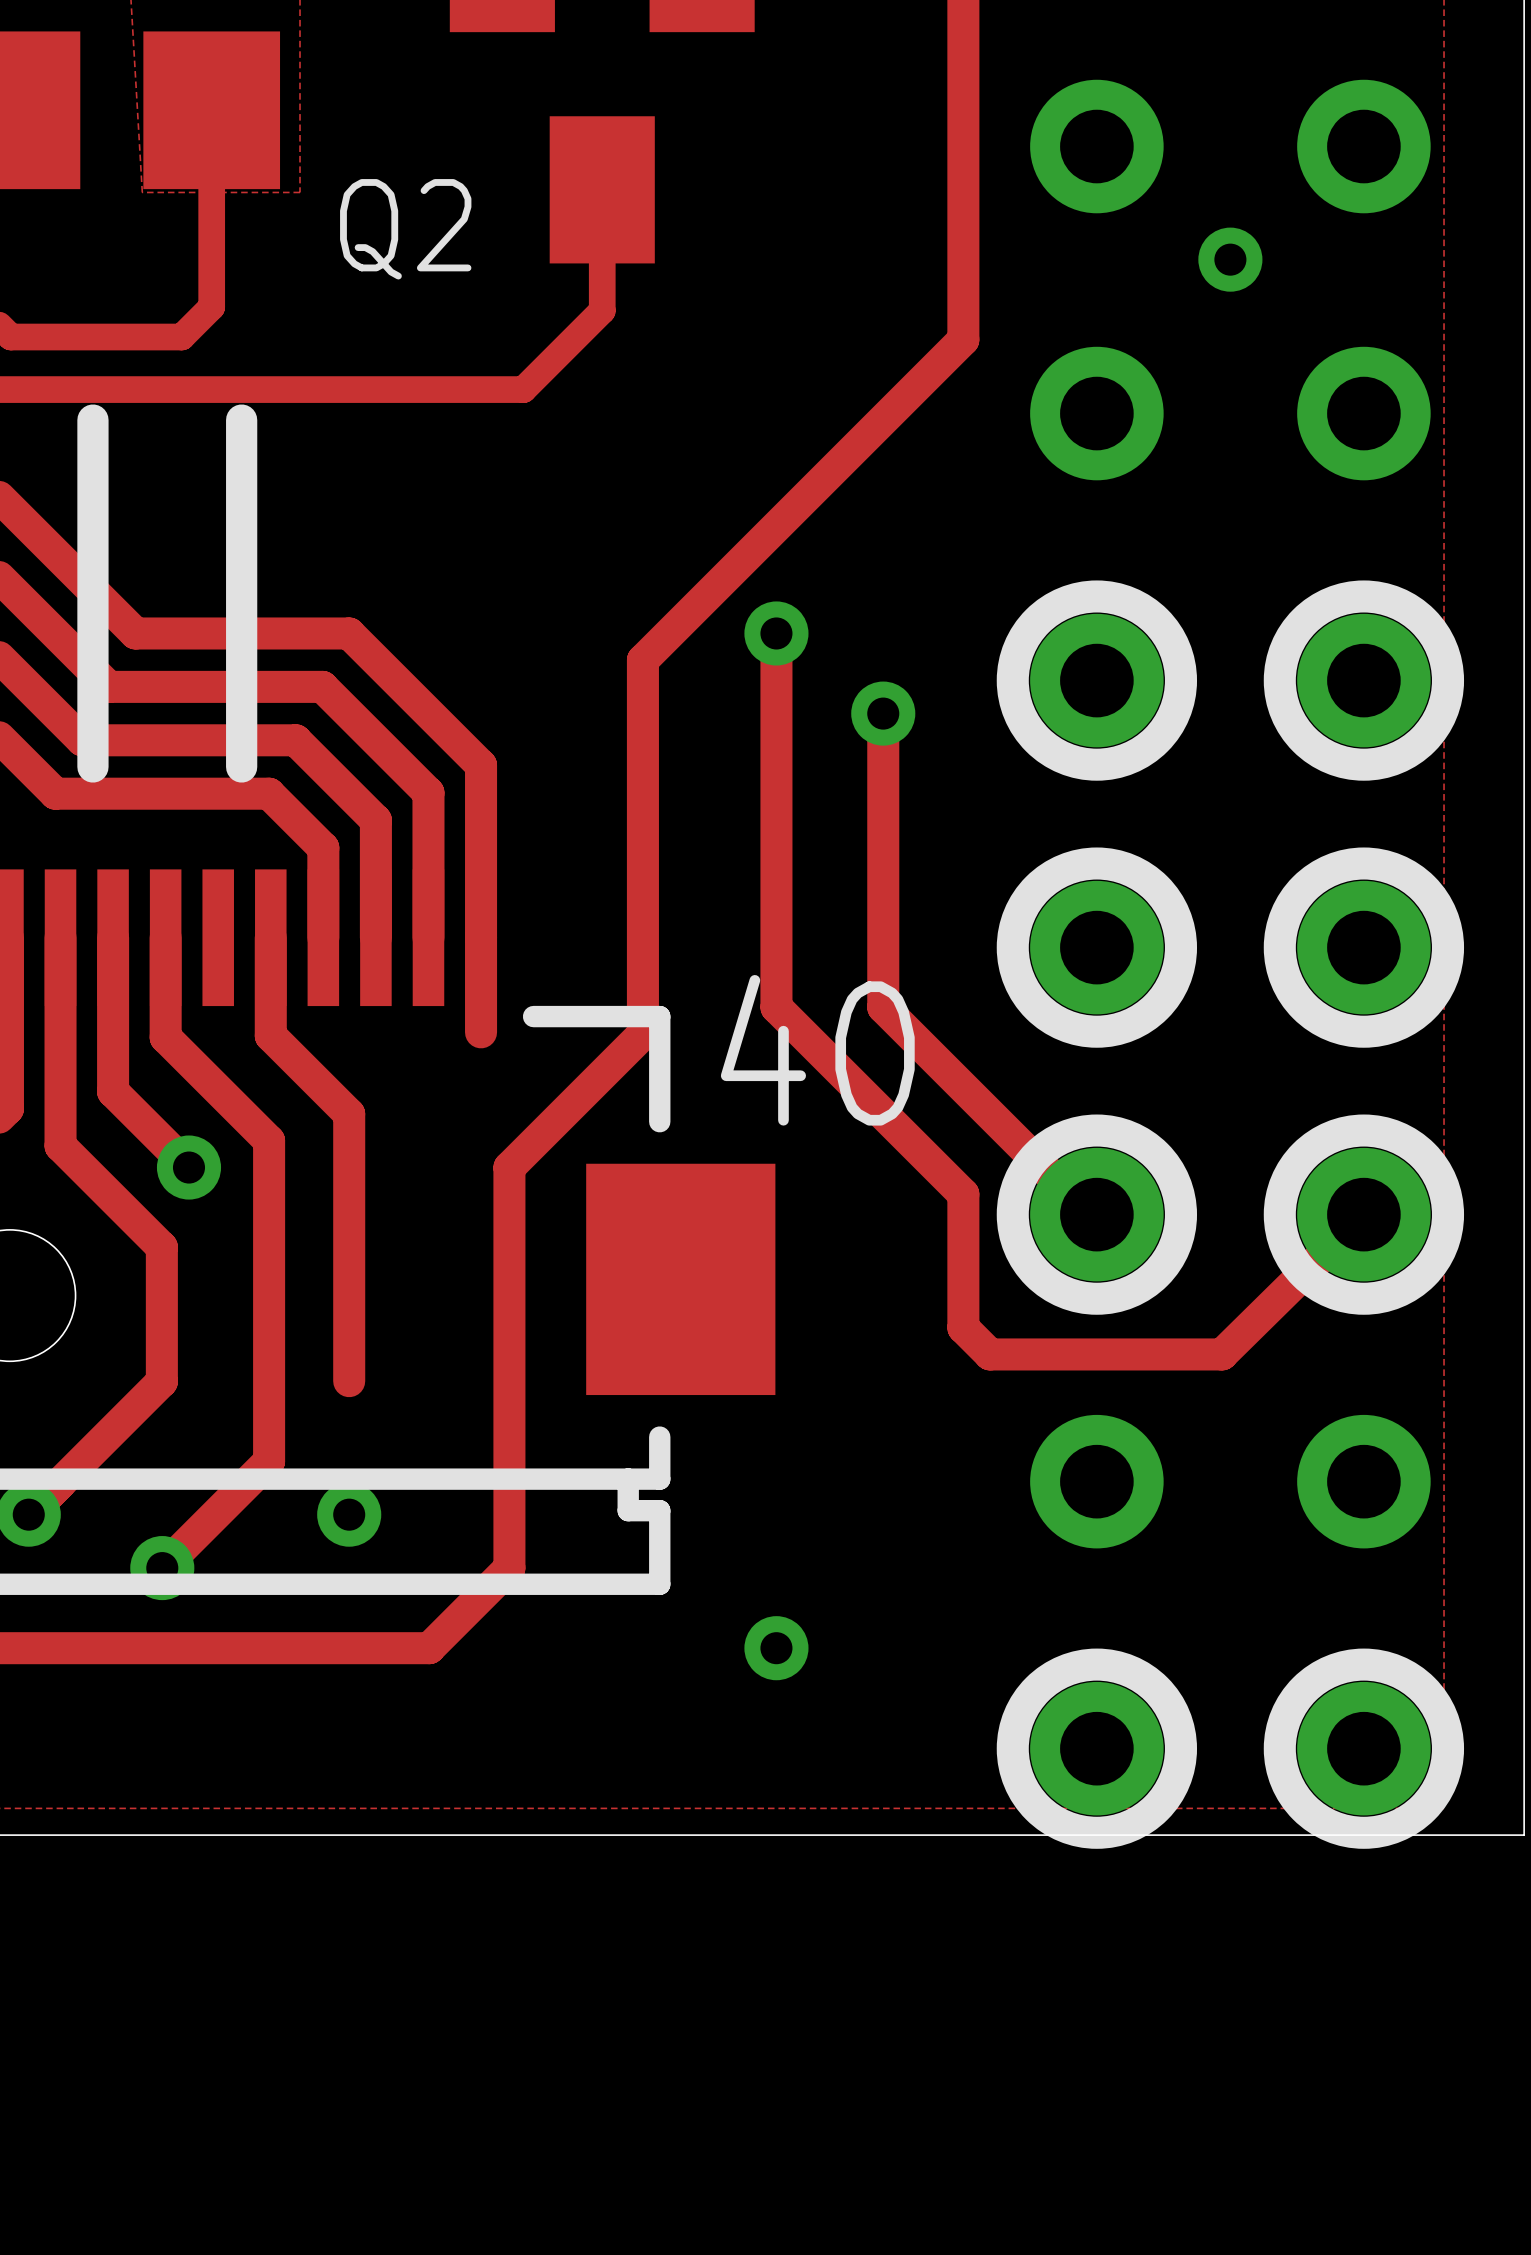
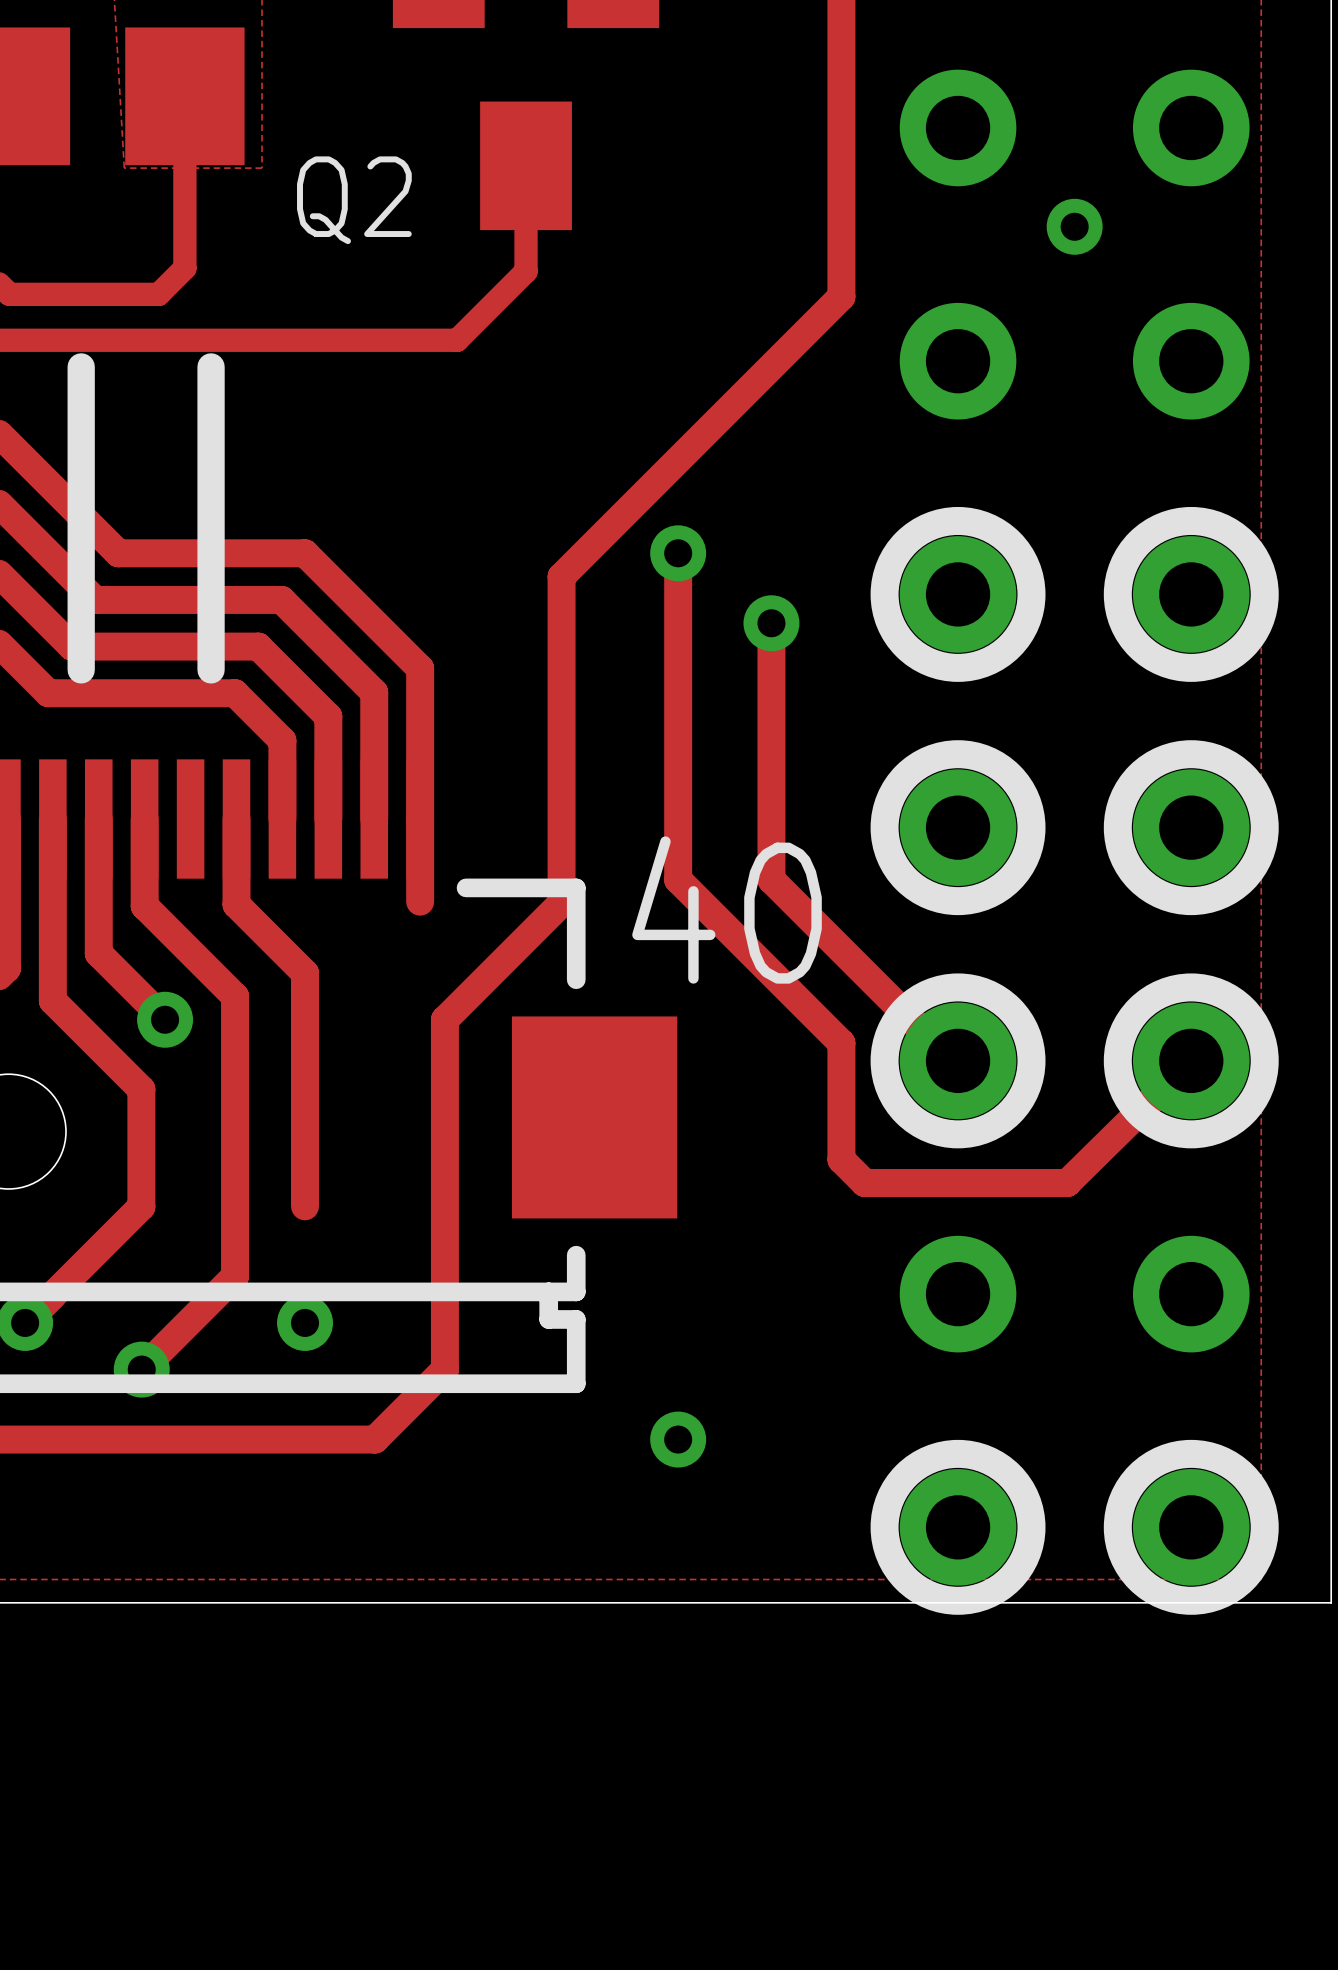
text position: 40 (817, 1050) -> 40 (727, 910)

